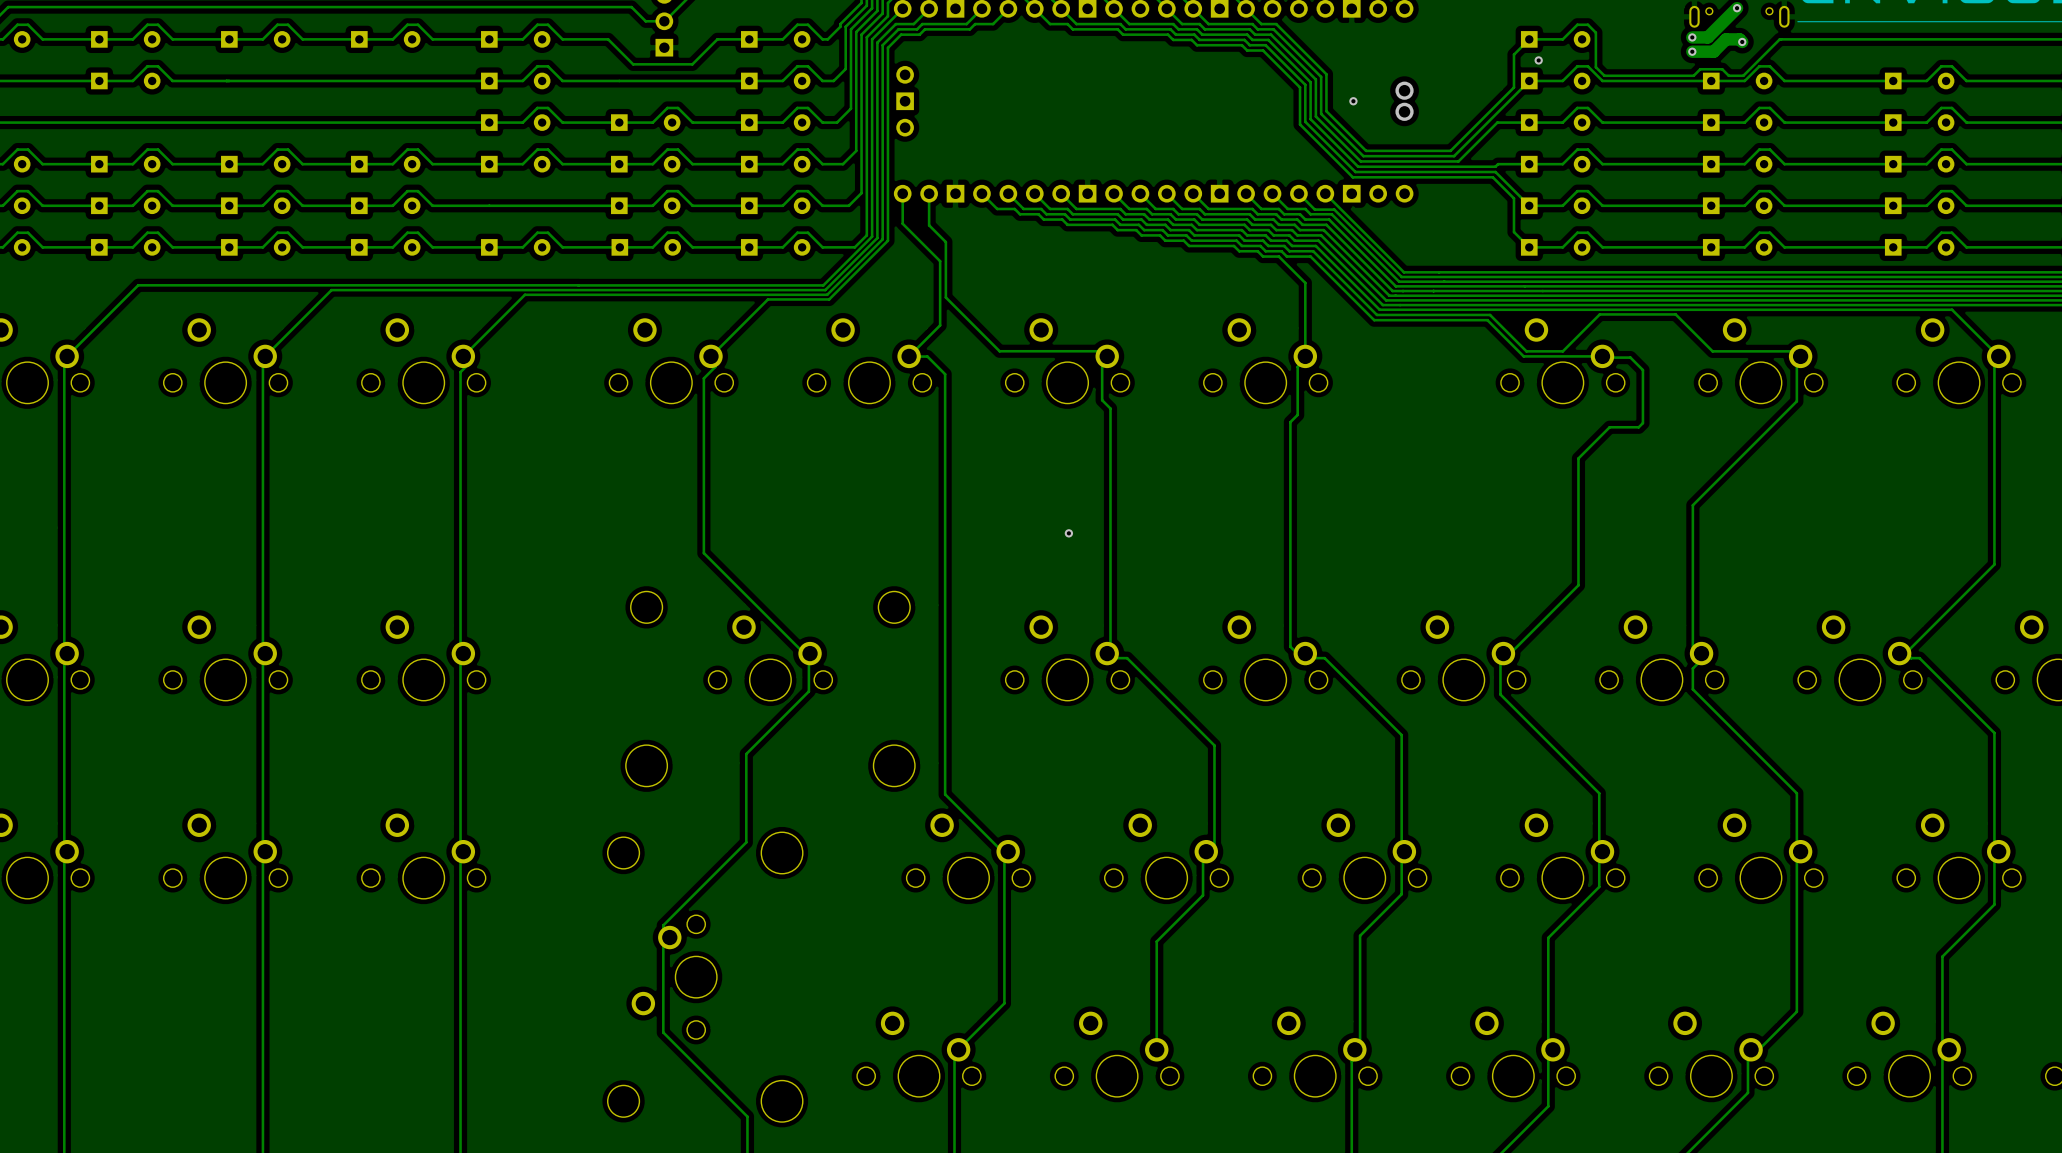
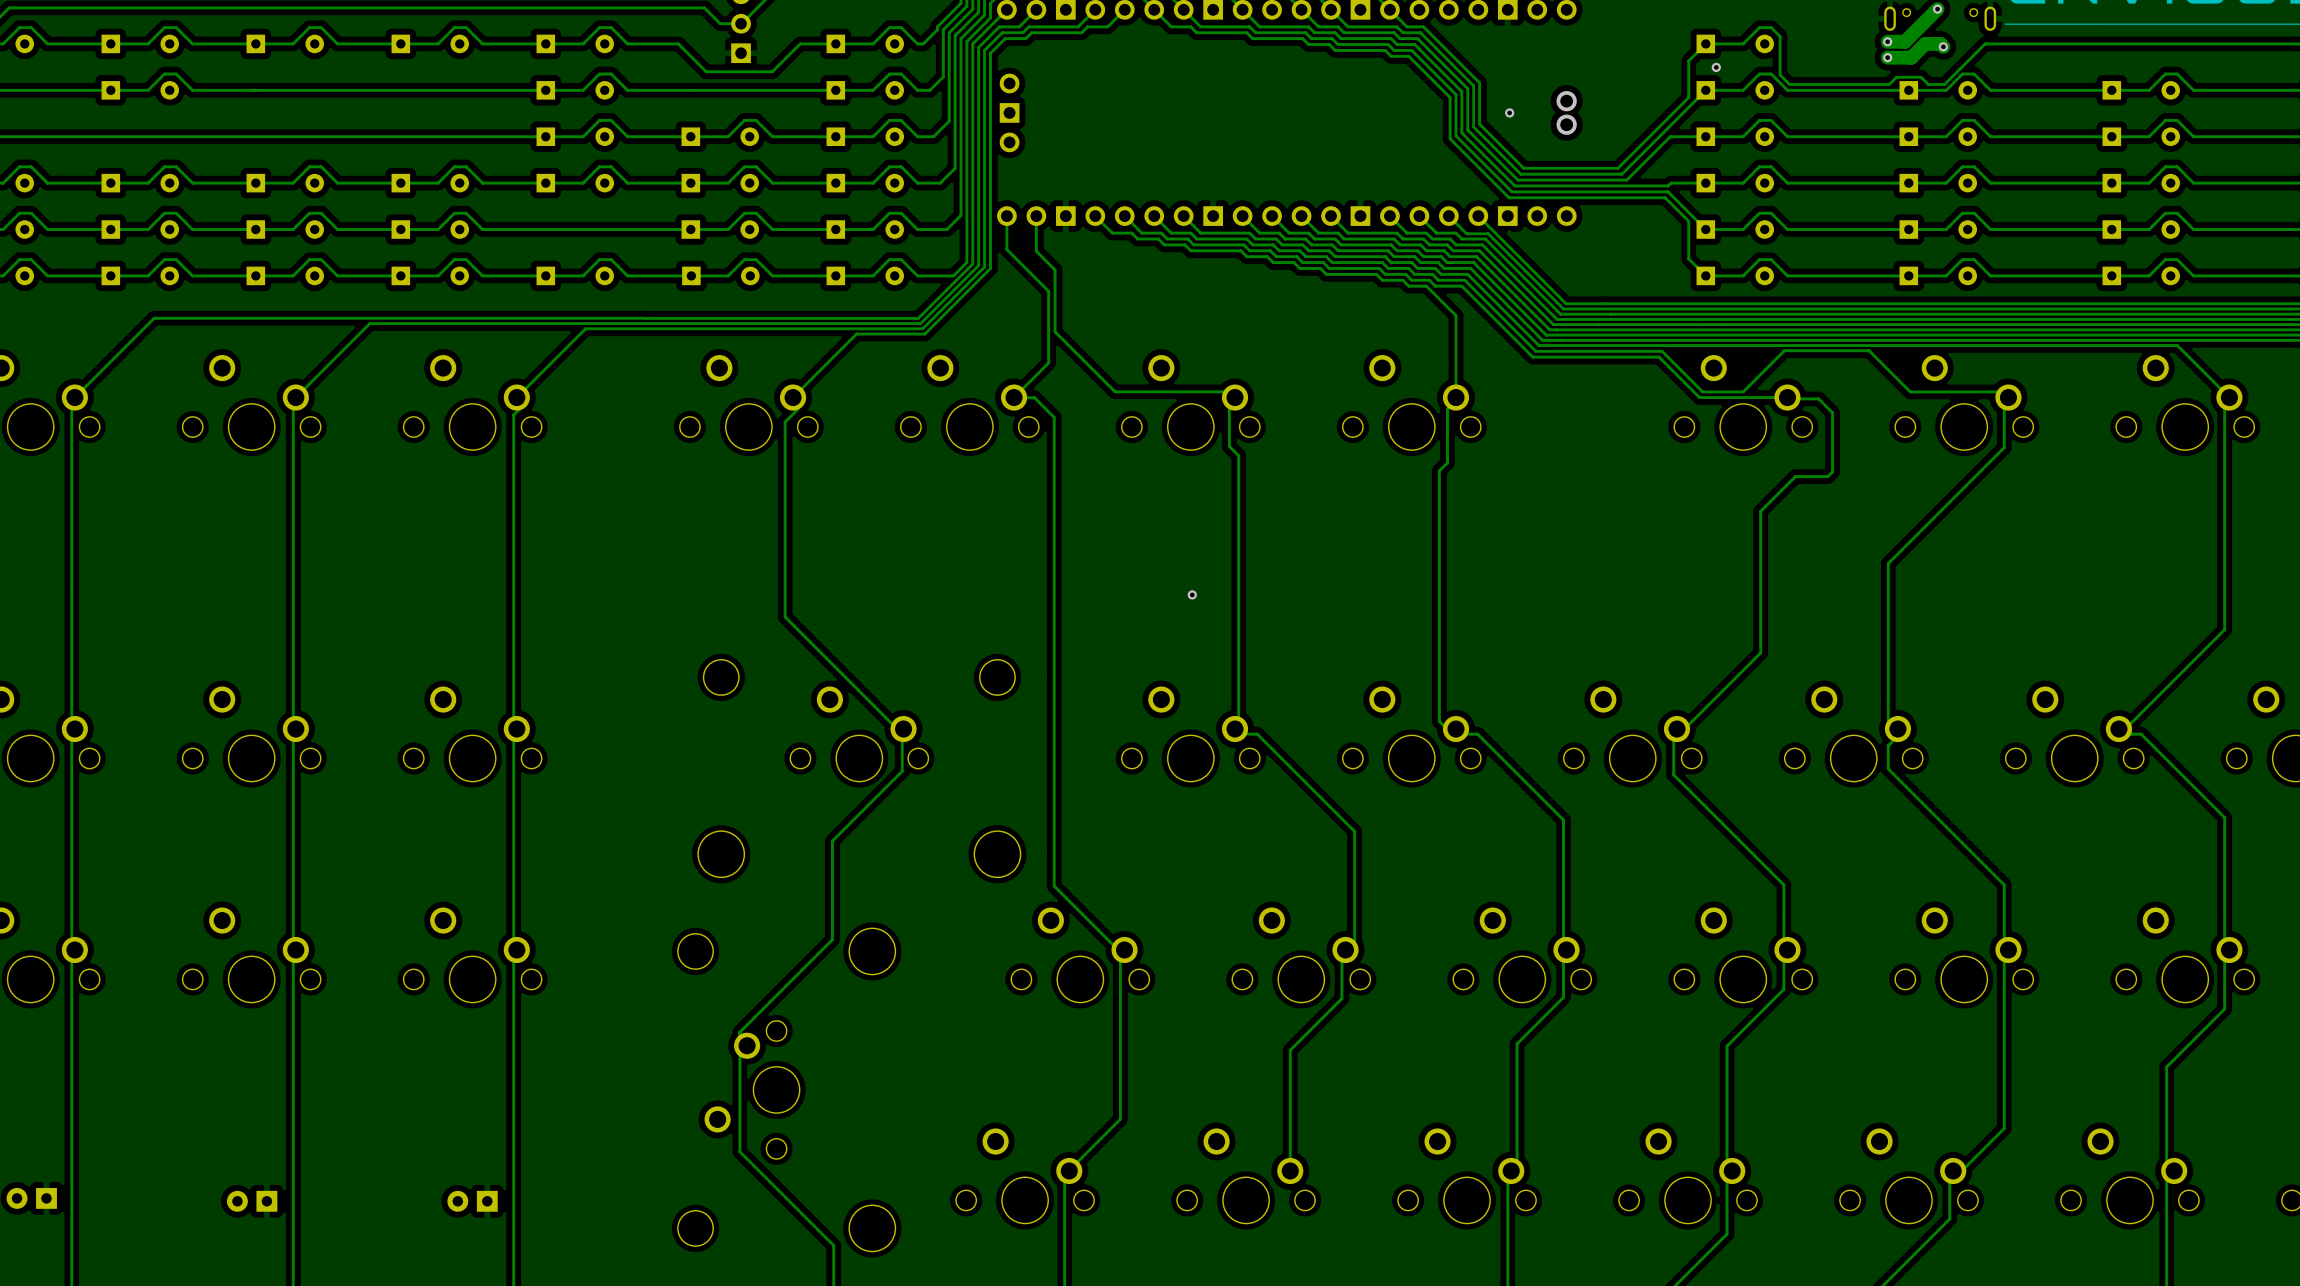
part: none -> (31, 1198)
part: none -> (252, 1201)
part: none -> (472, 1201)

